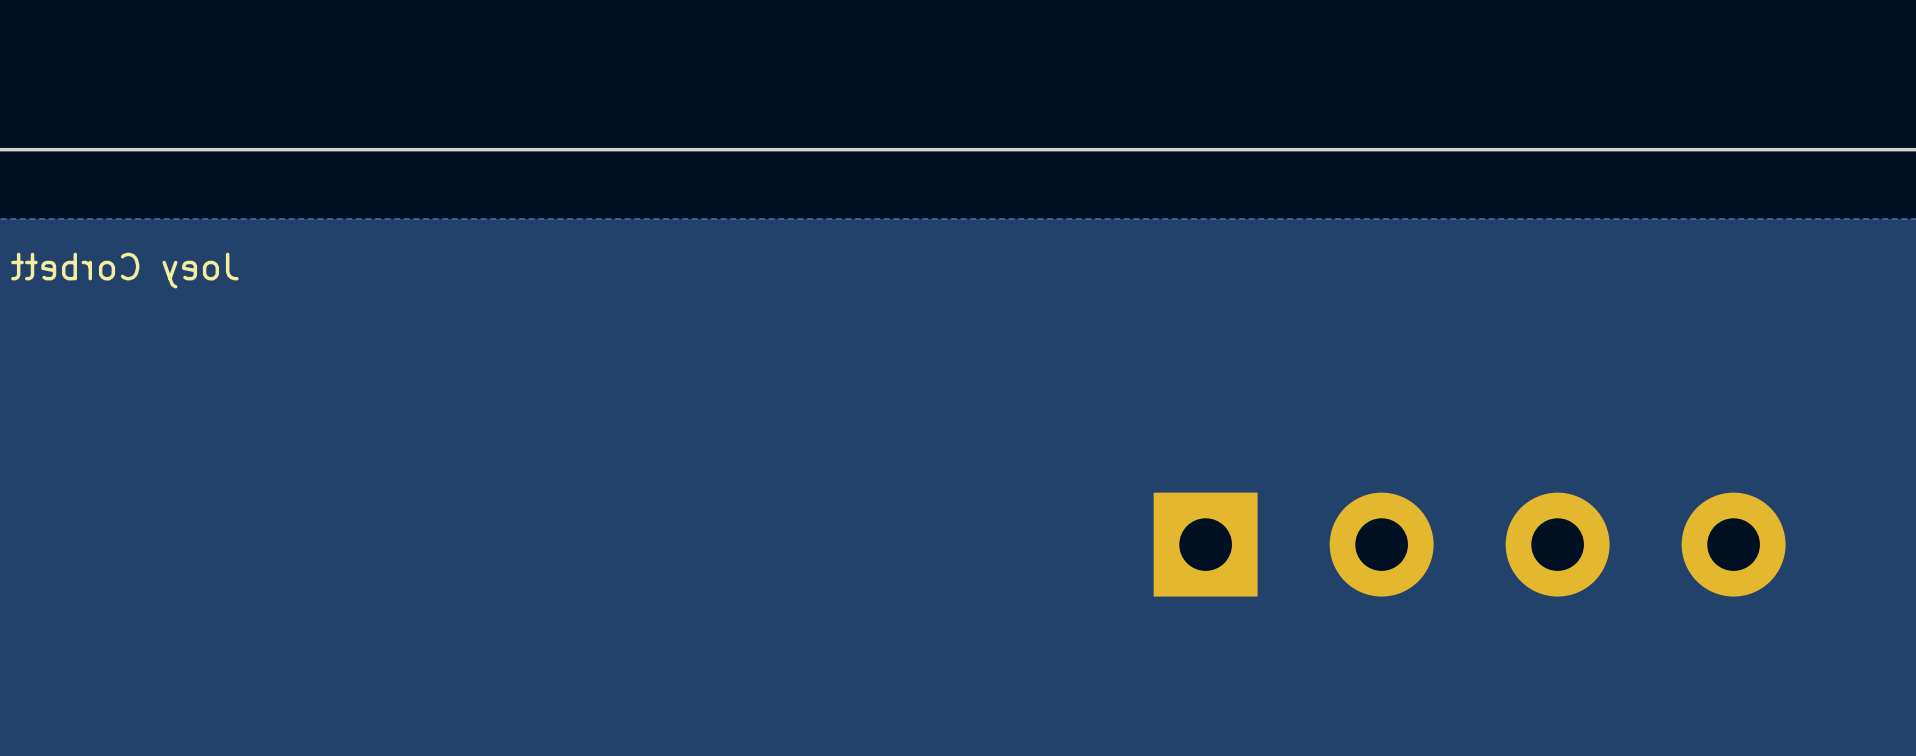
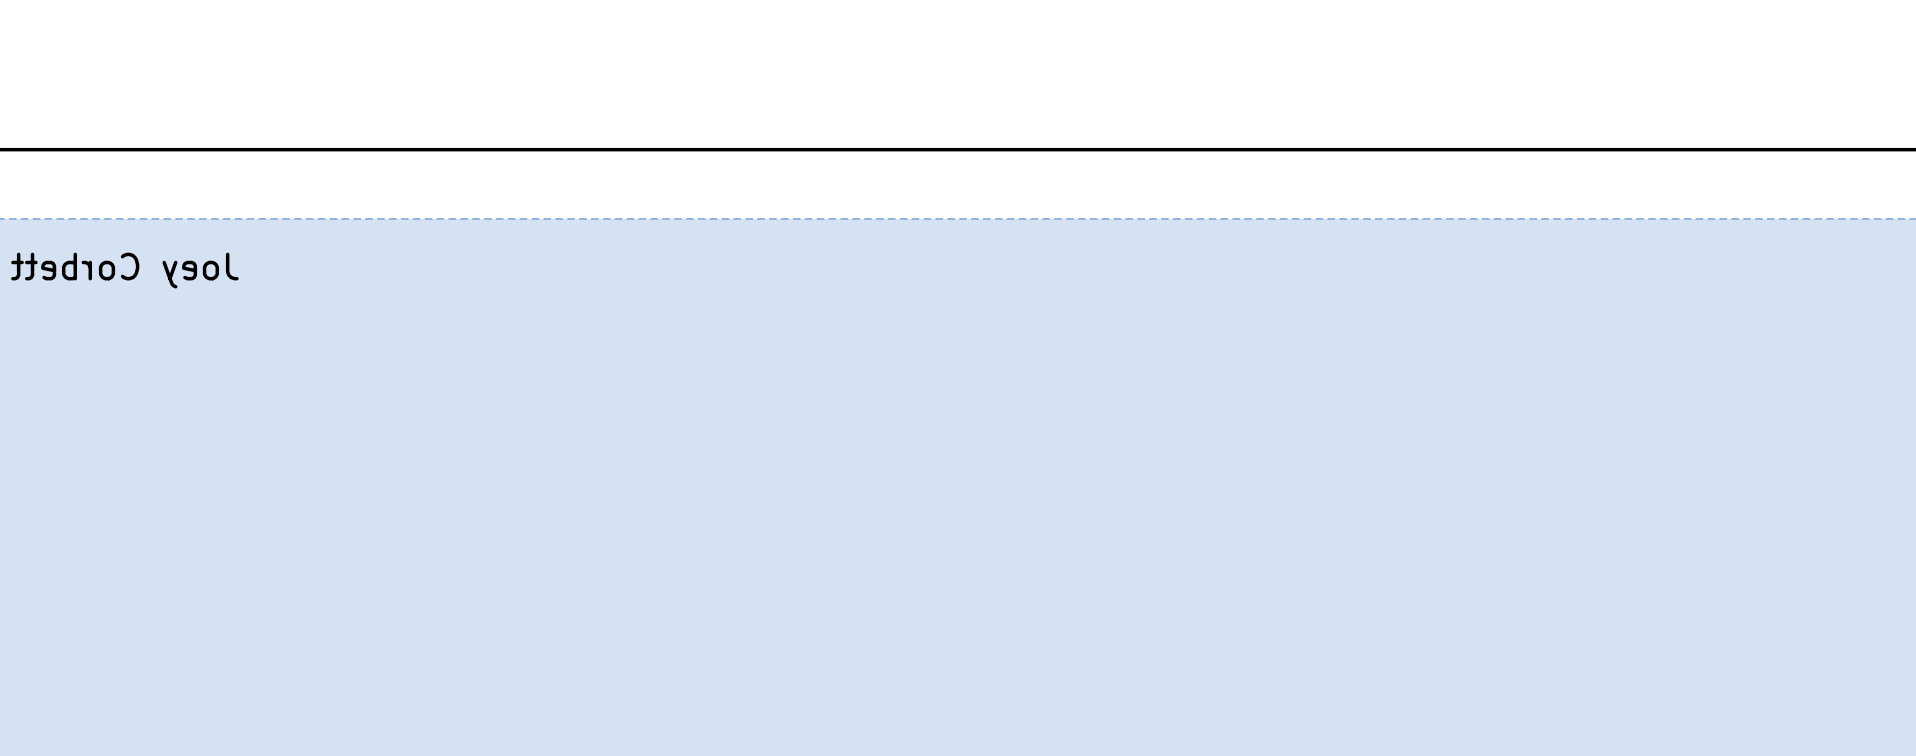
part: (1469, 544) -> none

